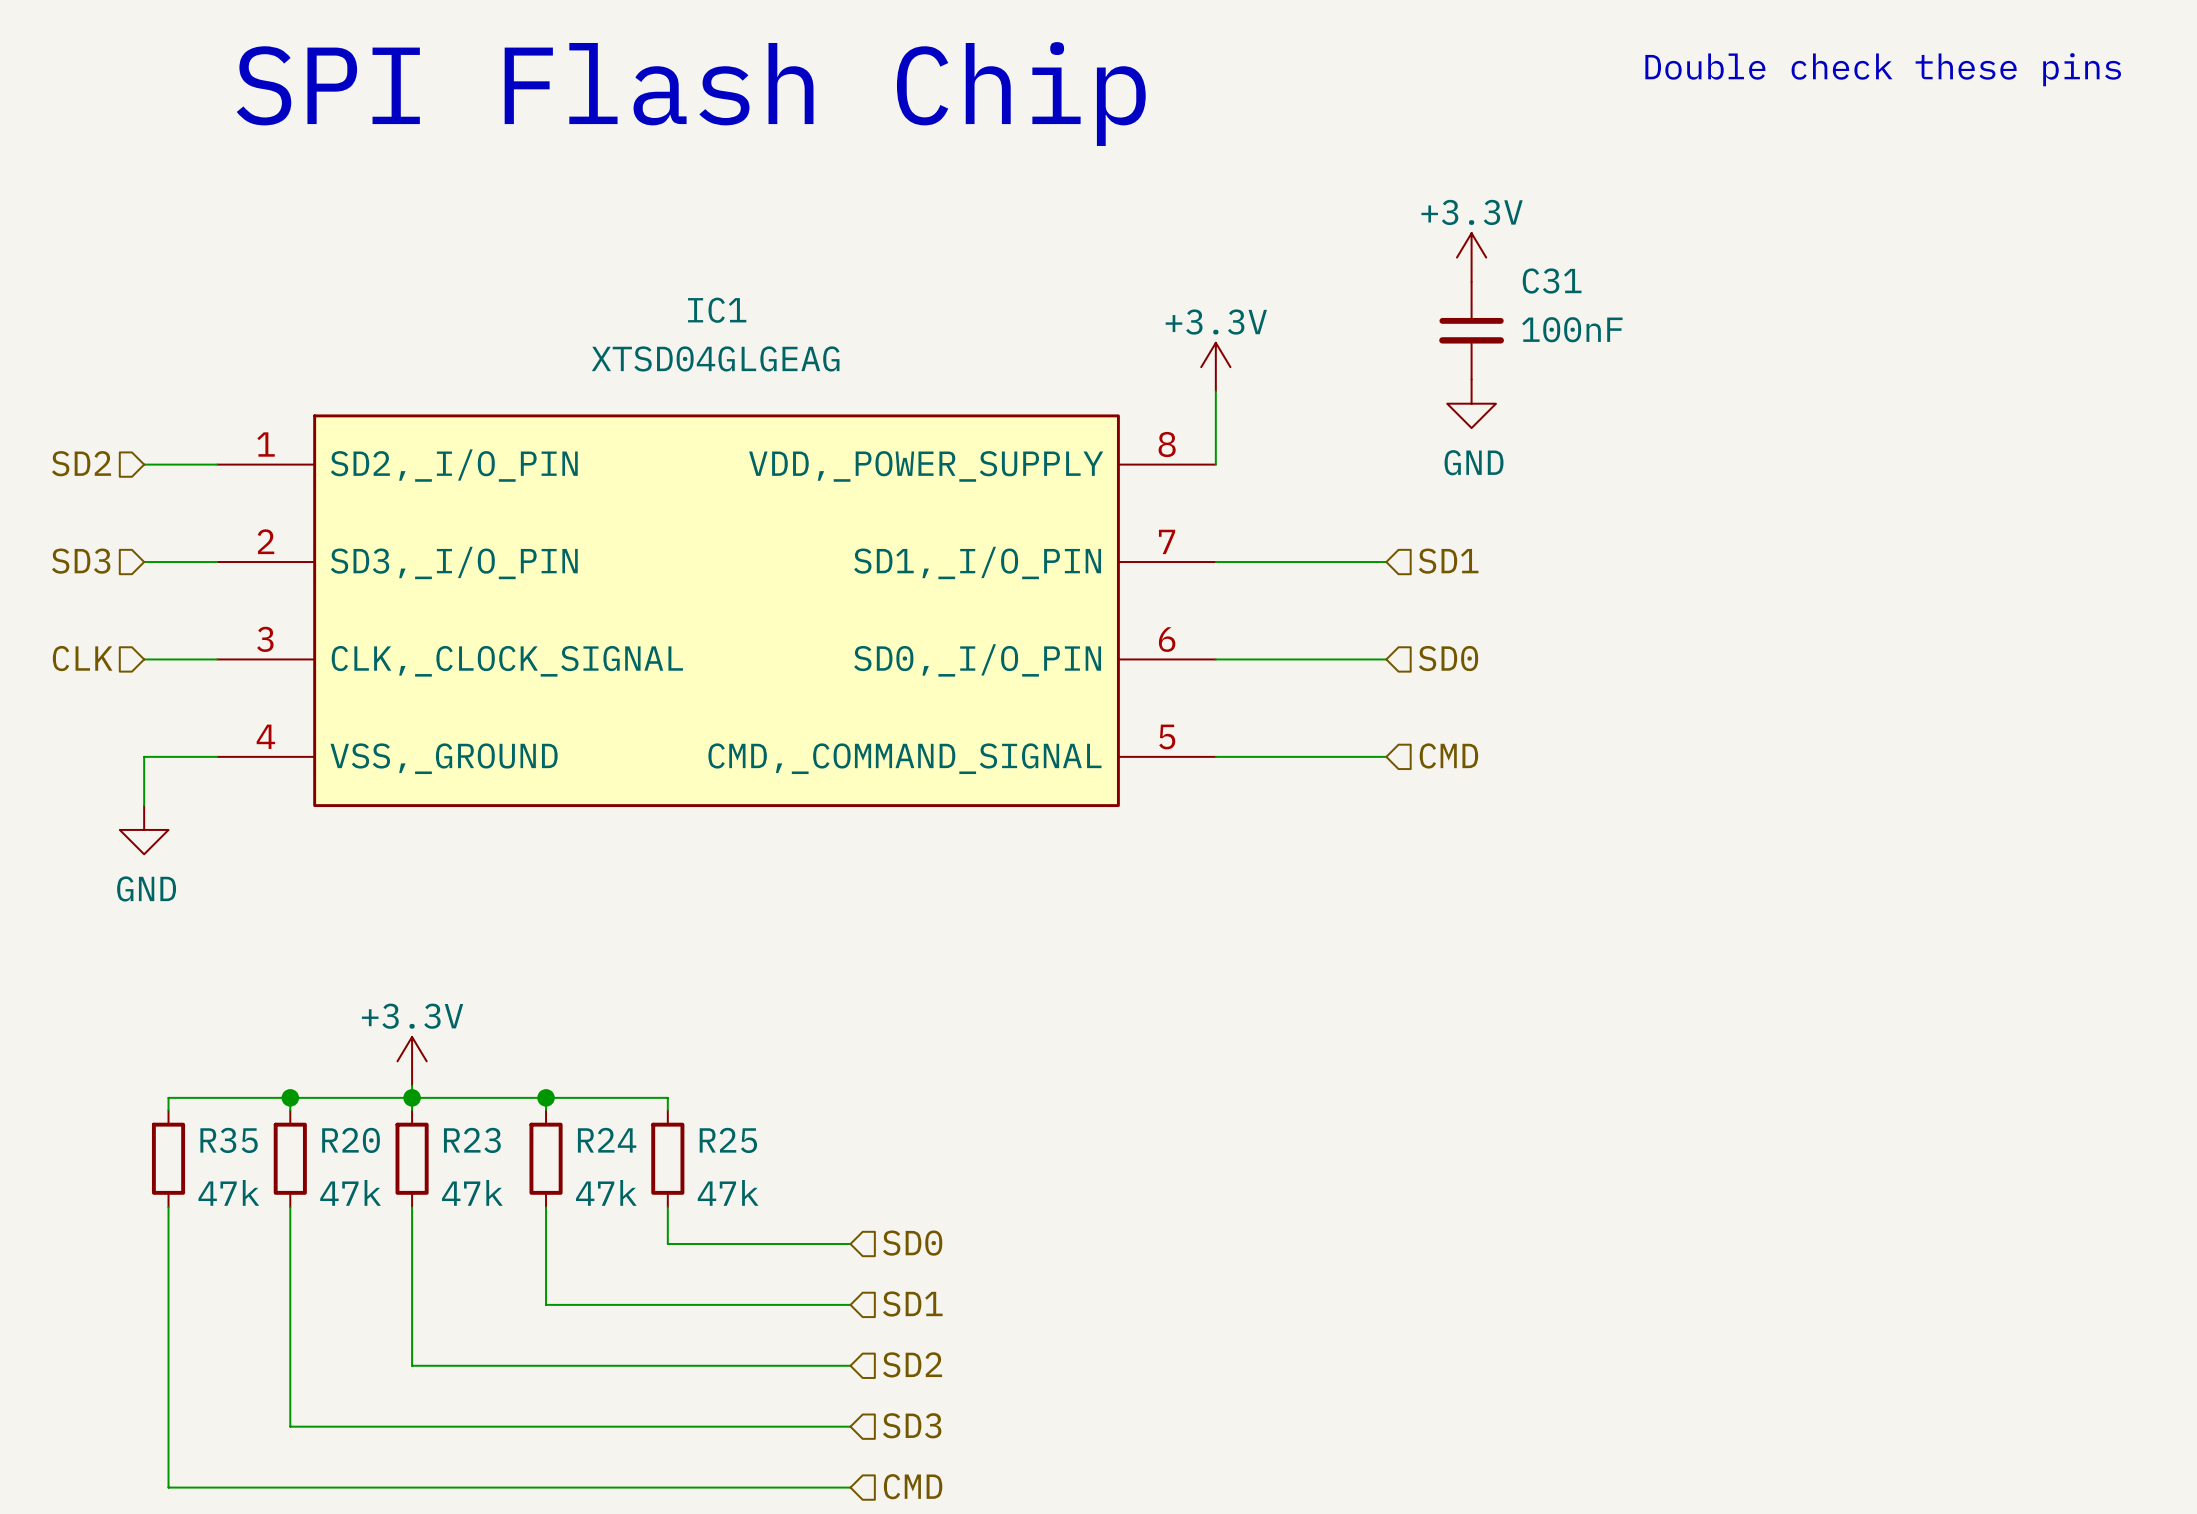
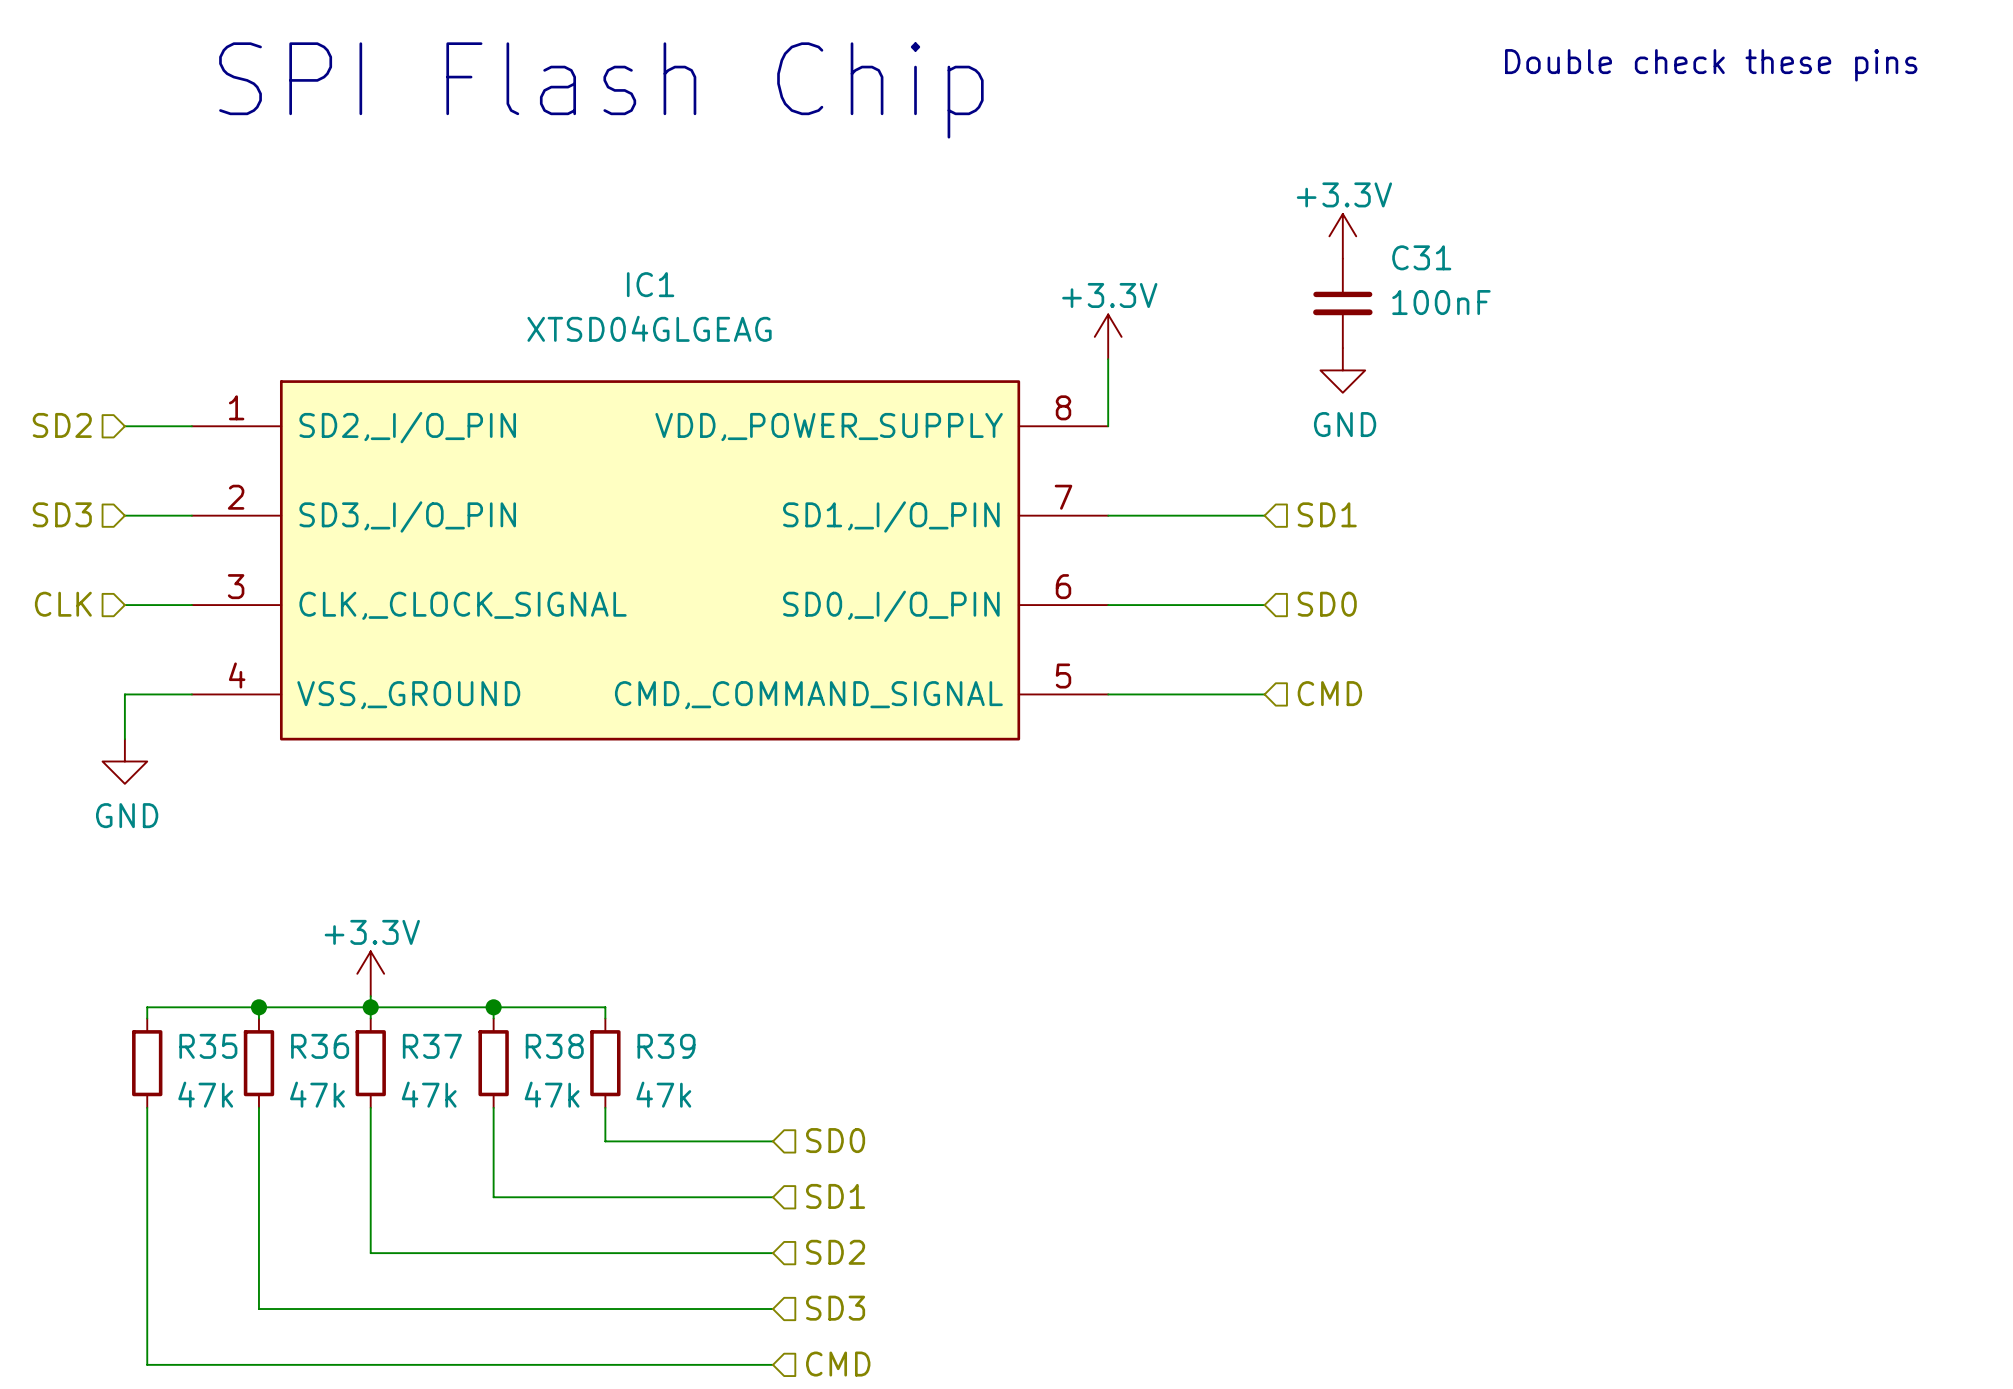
R20 name: R20 (351, 1140) -> R36 (320, 1046)
R23 name: R23 (472, 1140) -> R37 (432, 1046)
R24 name: R24 (607, 1140) -> R38 (554, 1046)
R25 name: R25 (728, 1140) -> R39 (666, 1046)

